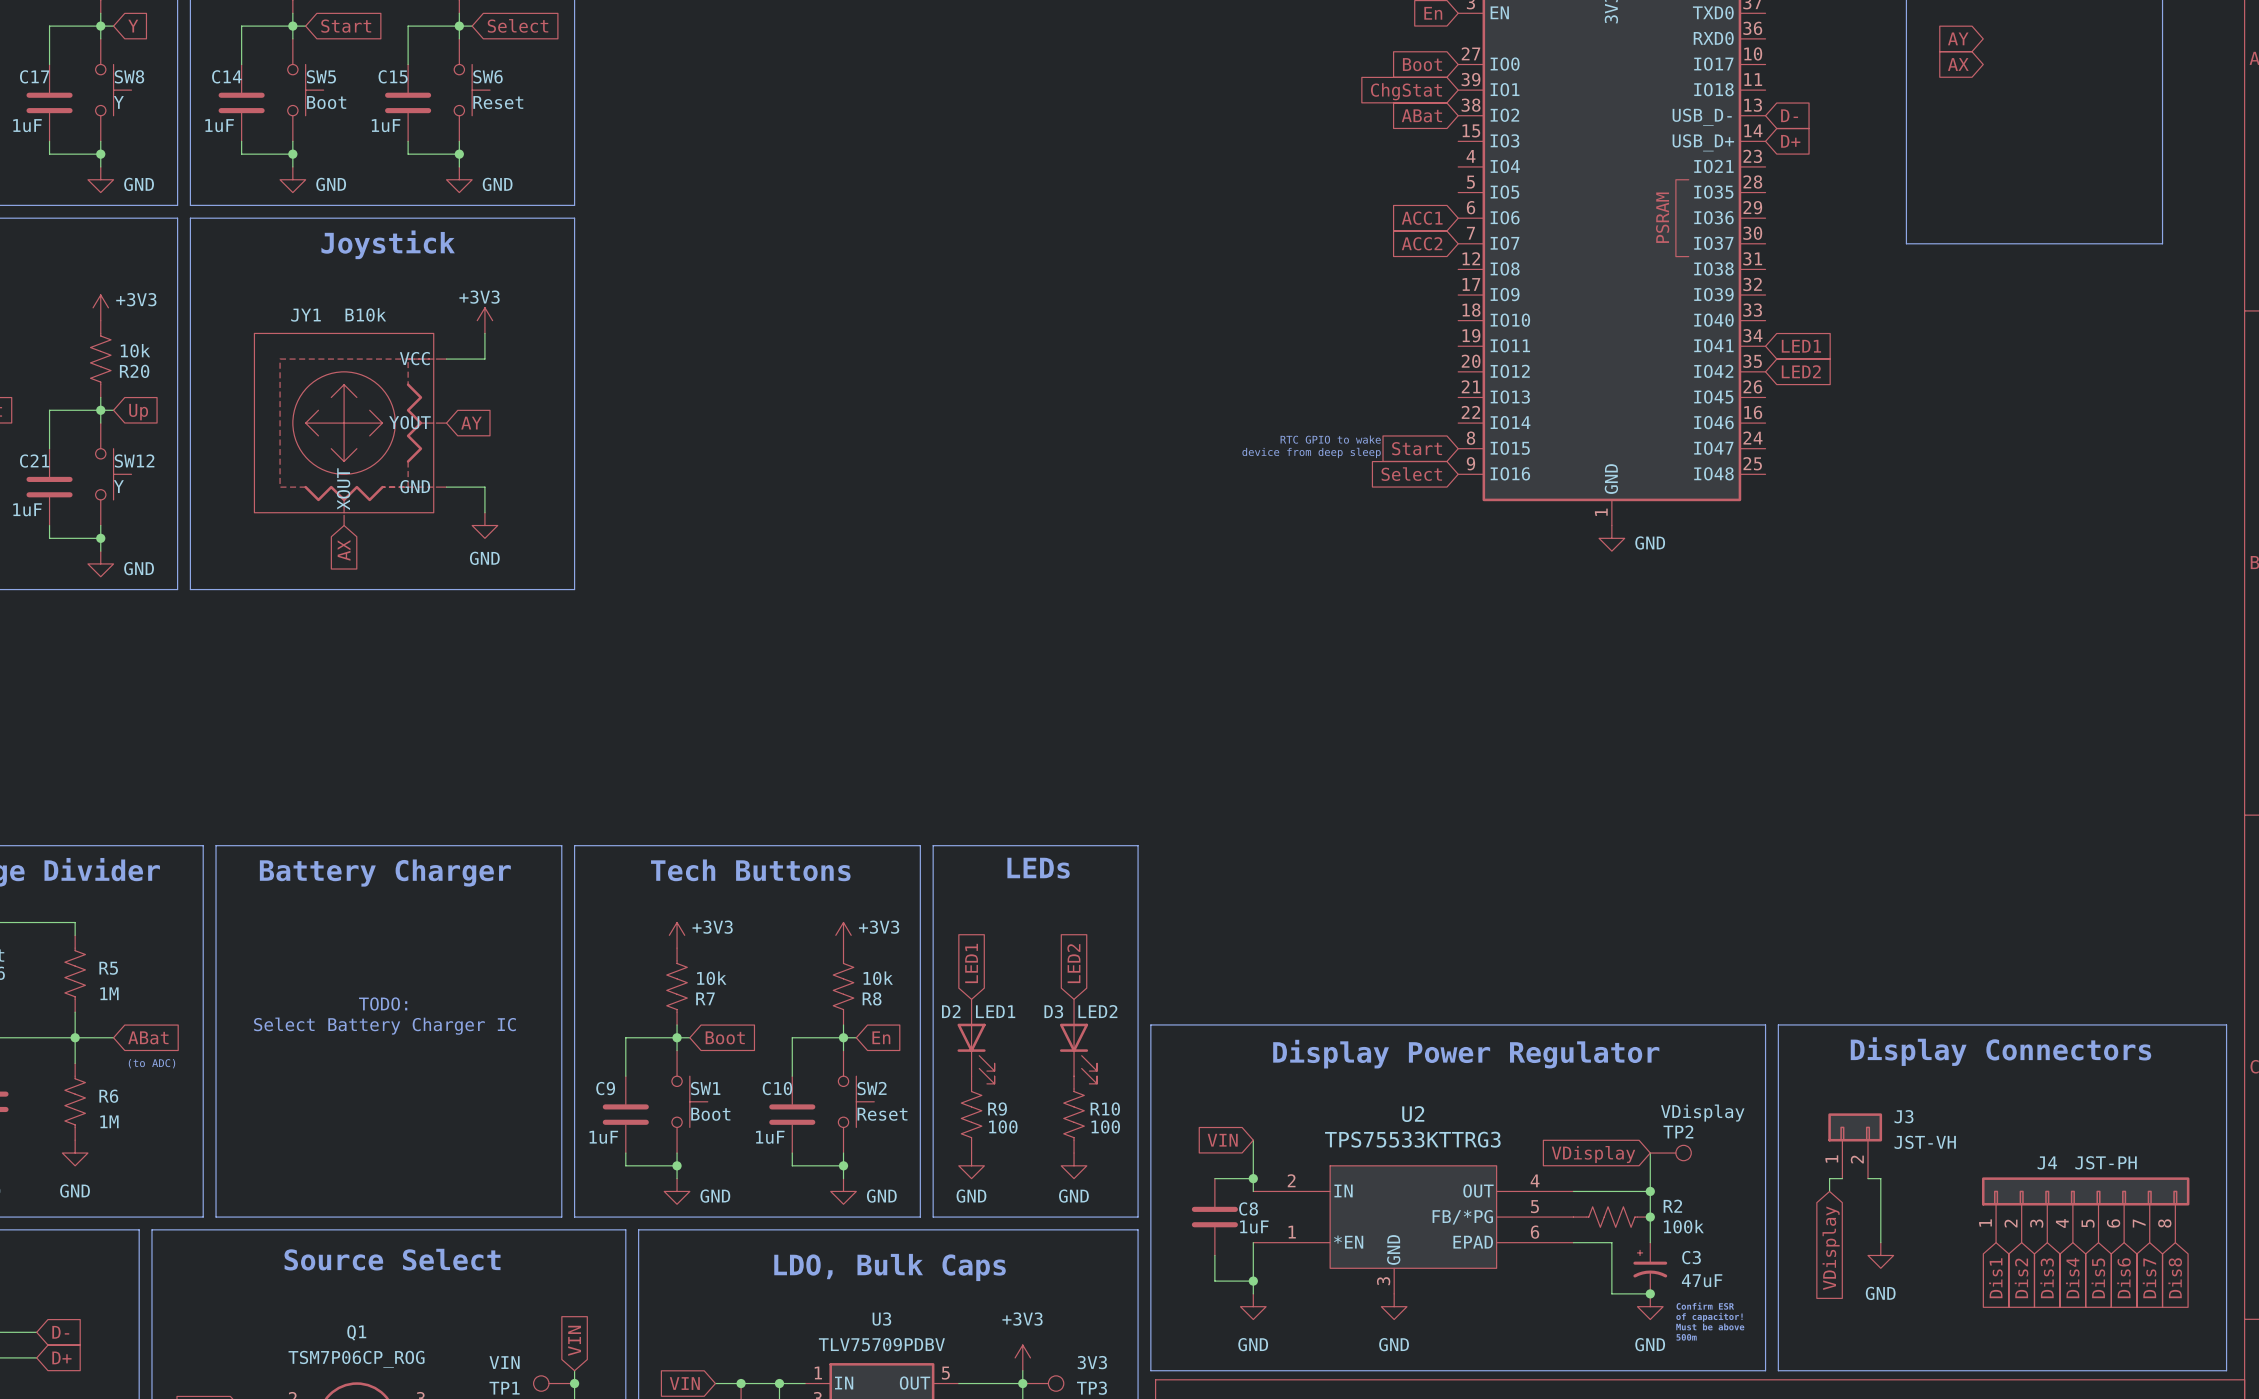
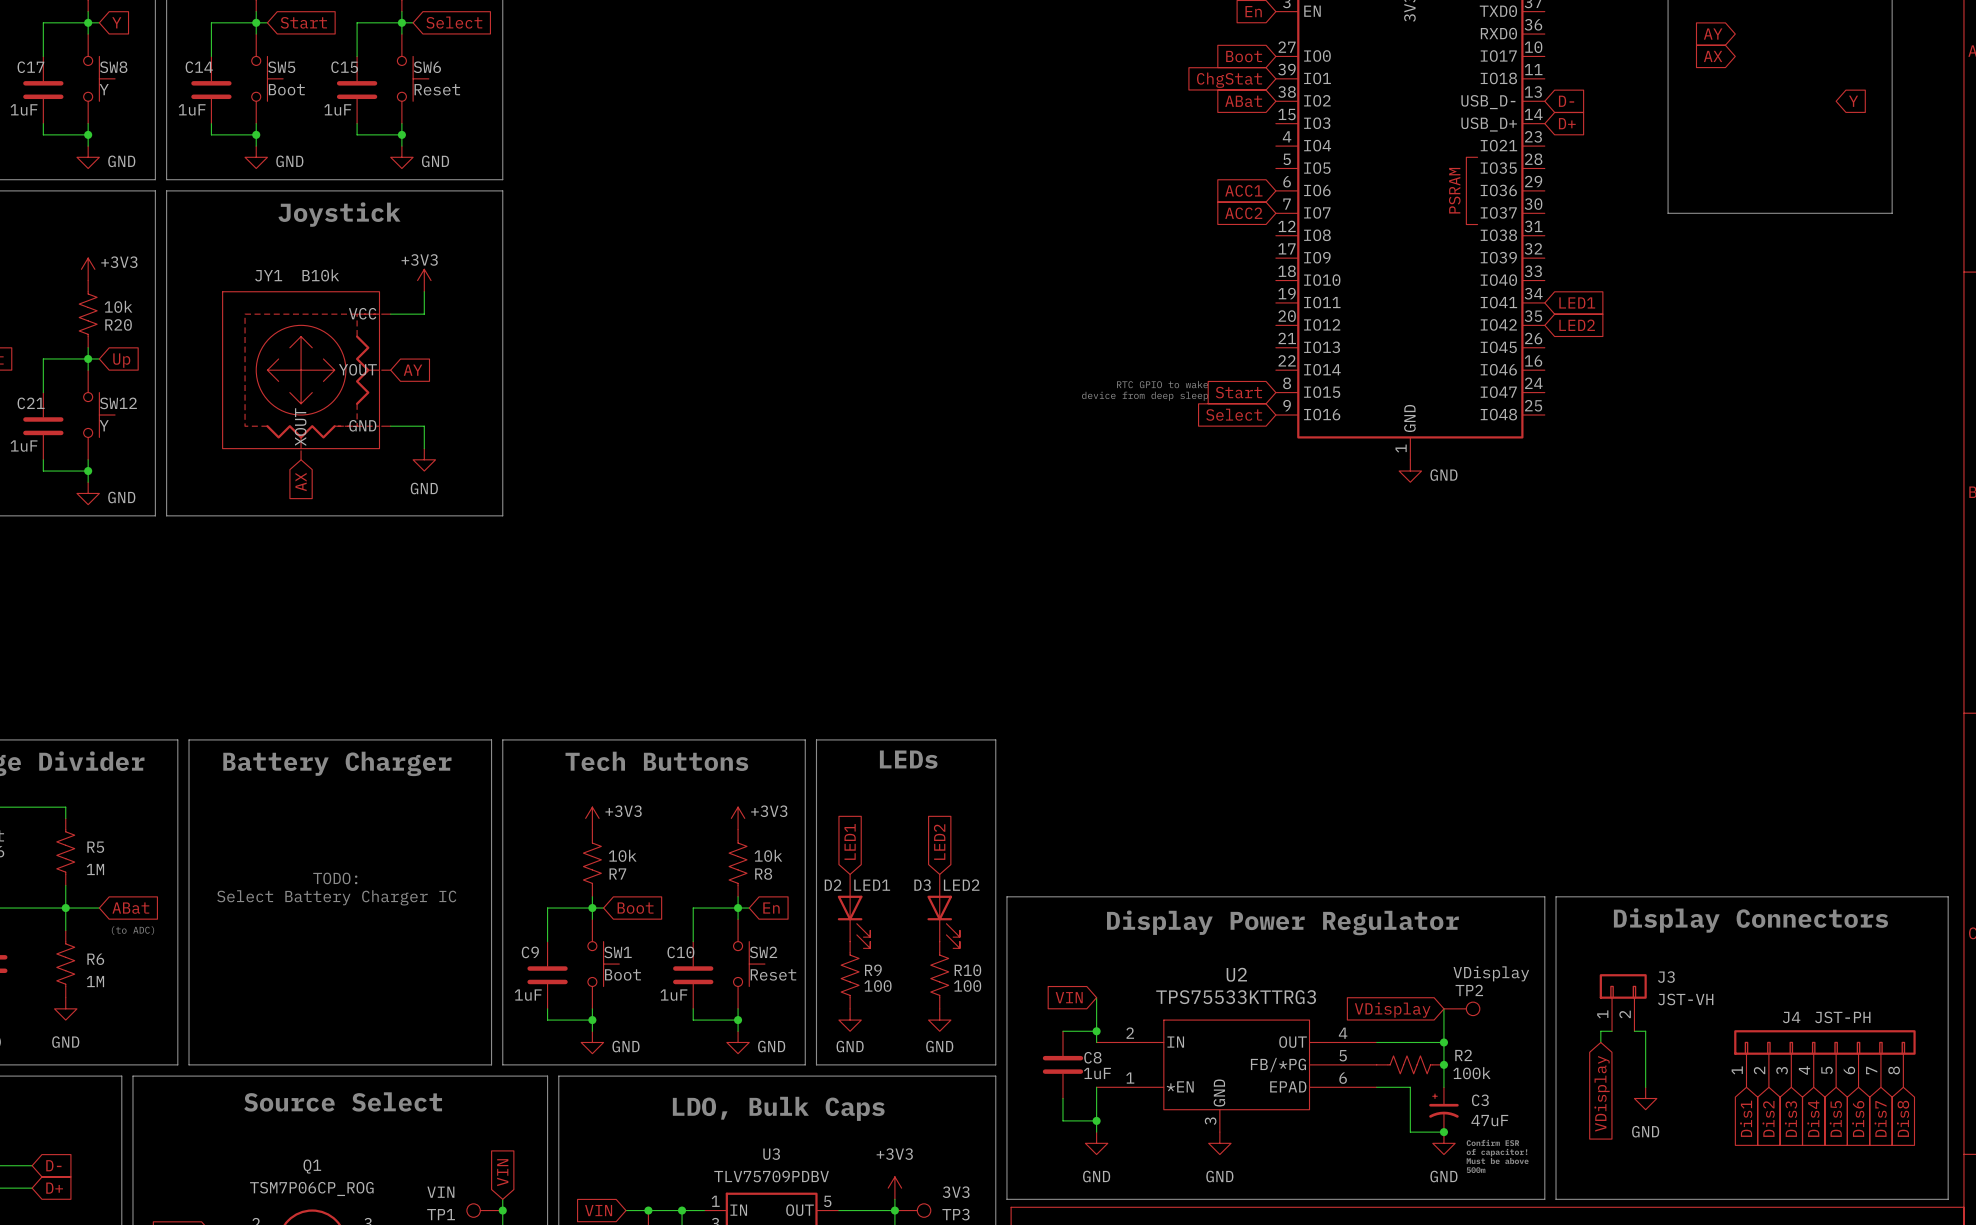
global label: none -> Y (1853, 101)

